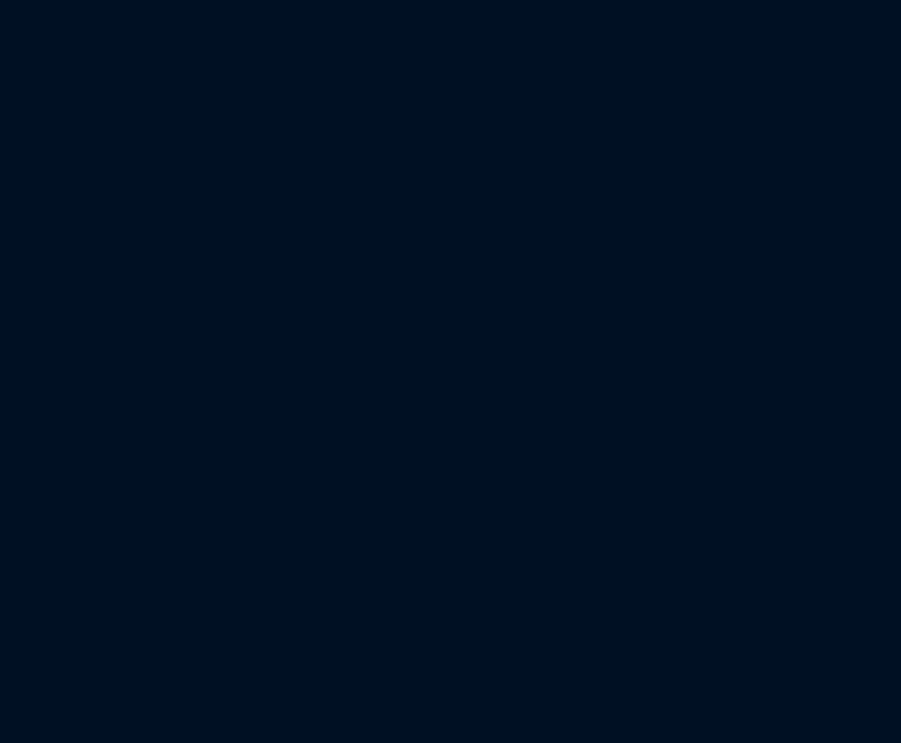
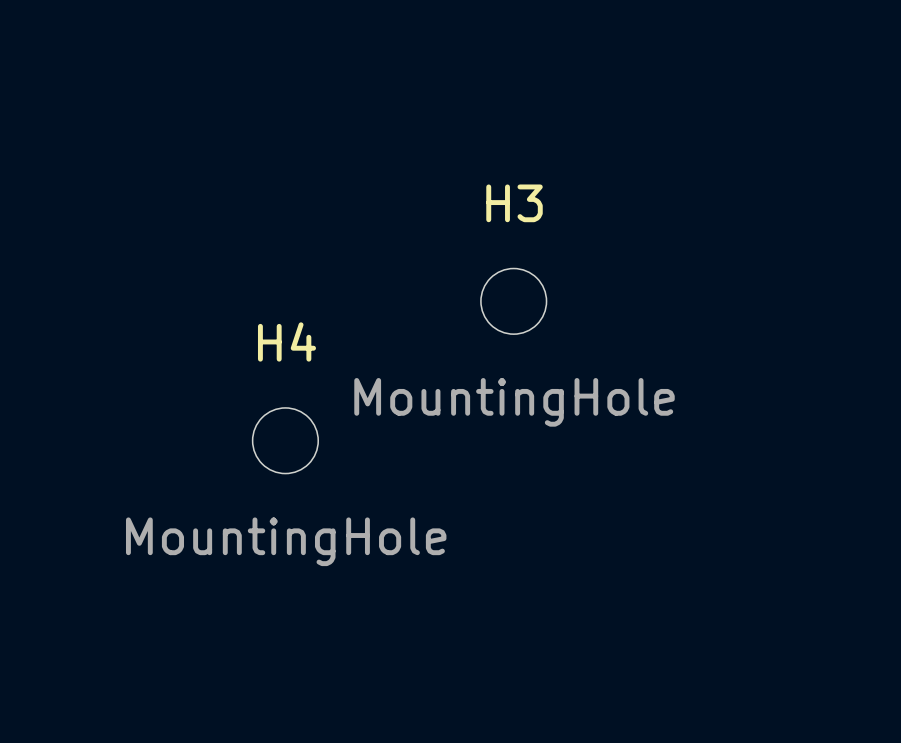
H3: none -> MountingHole (513, 301)
H4: none -> MountingHole (285, 440)

